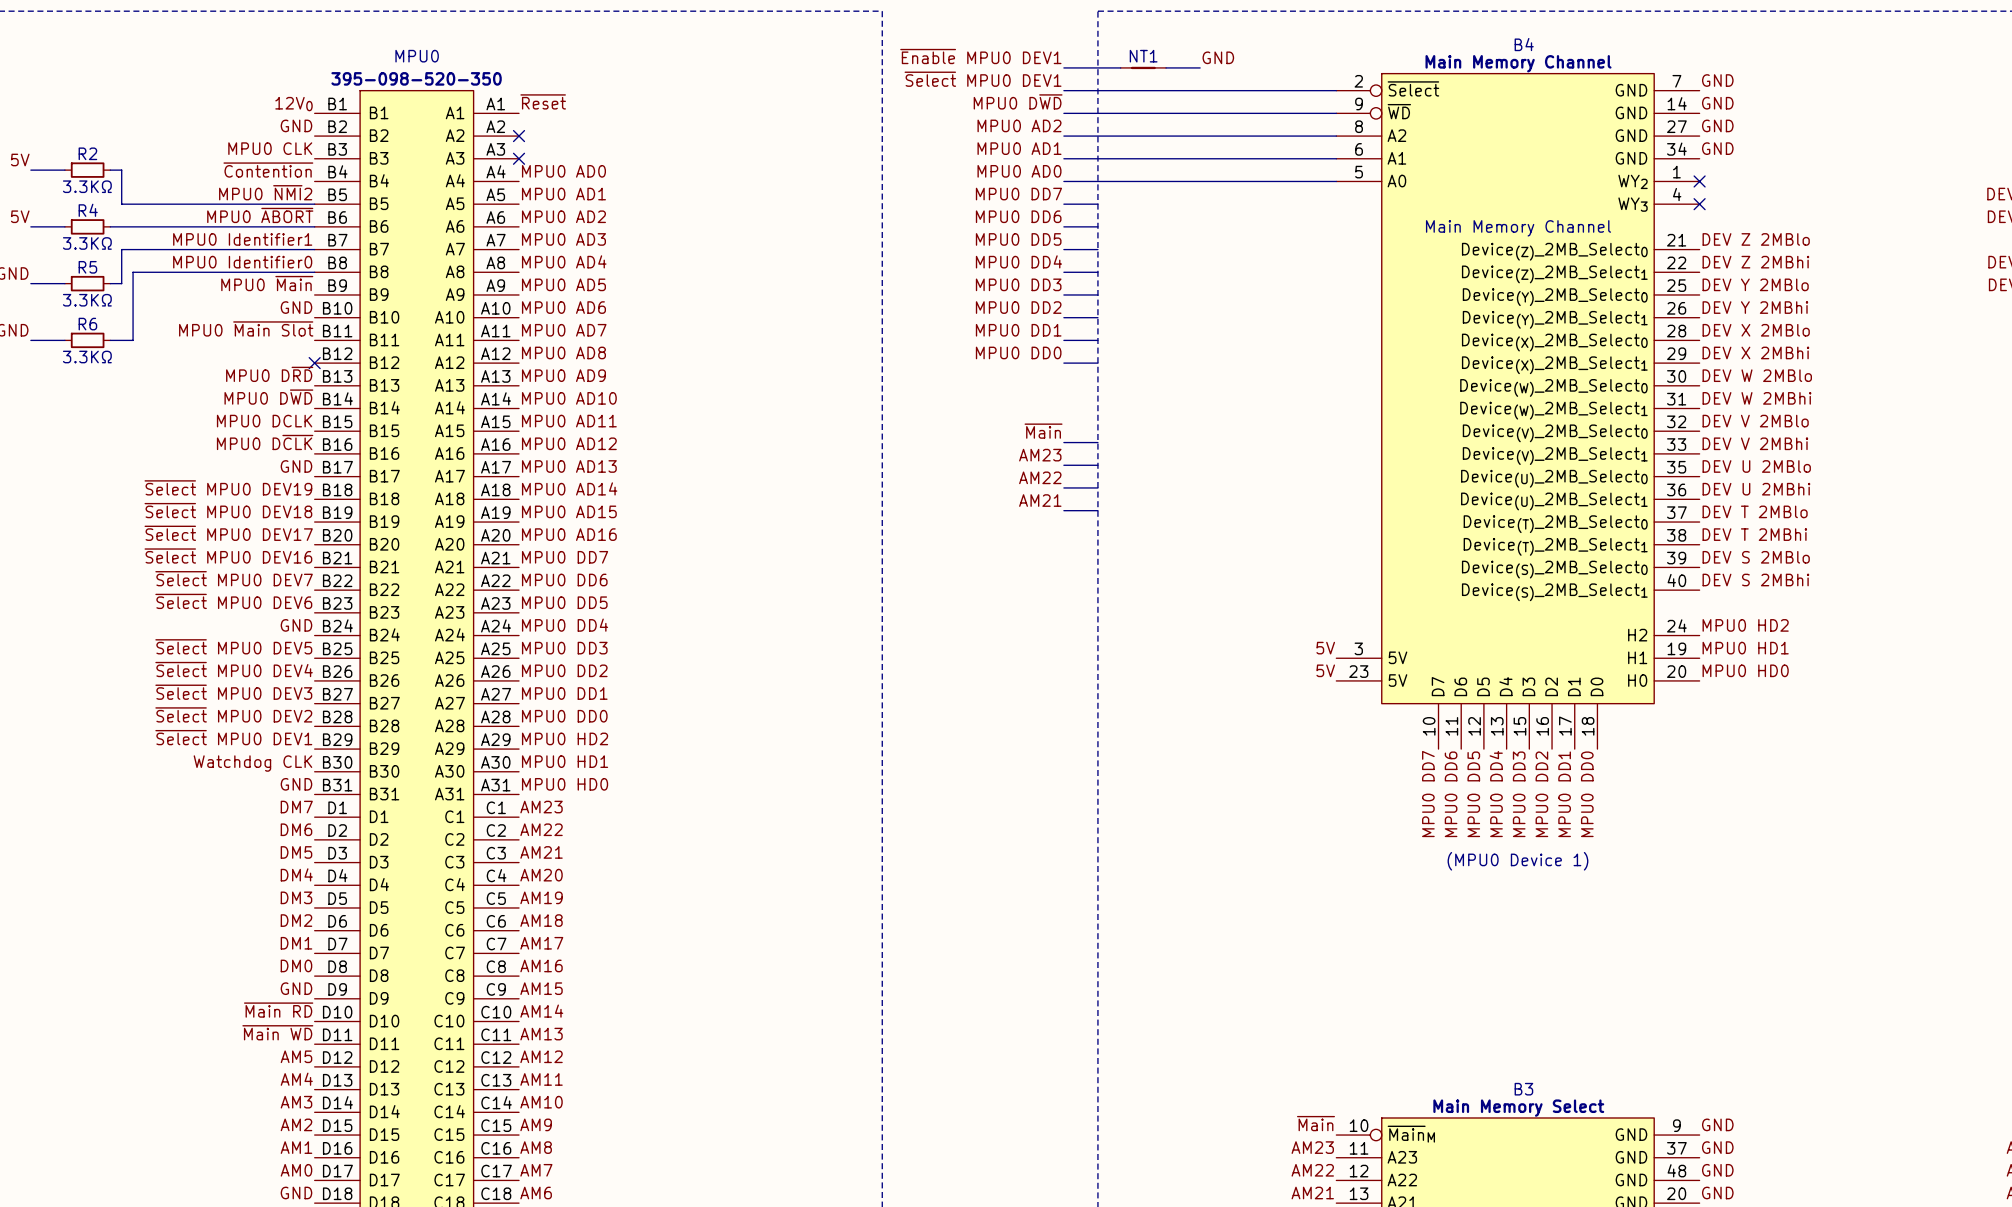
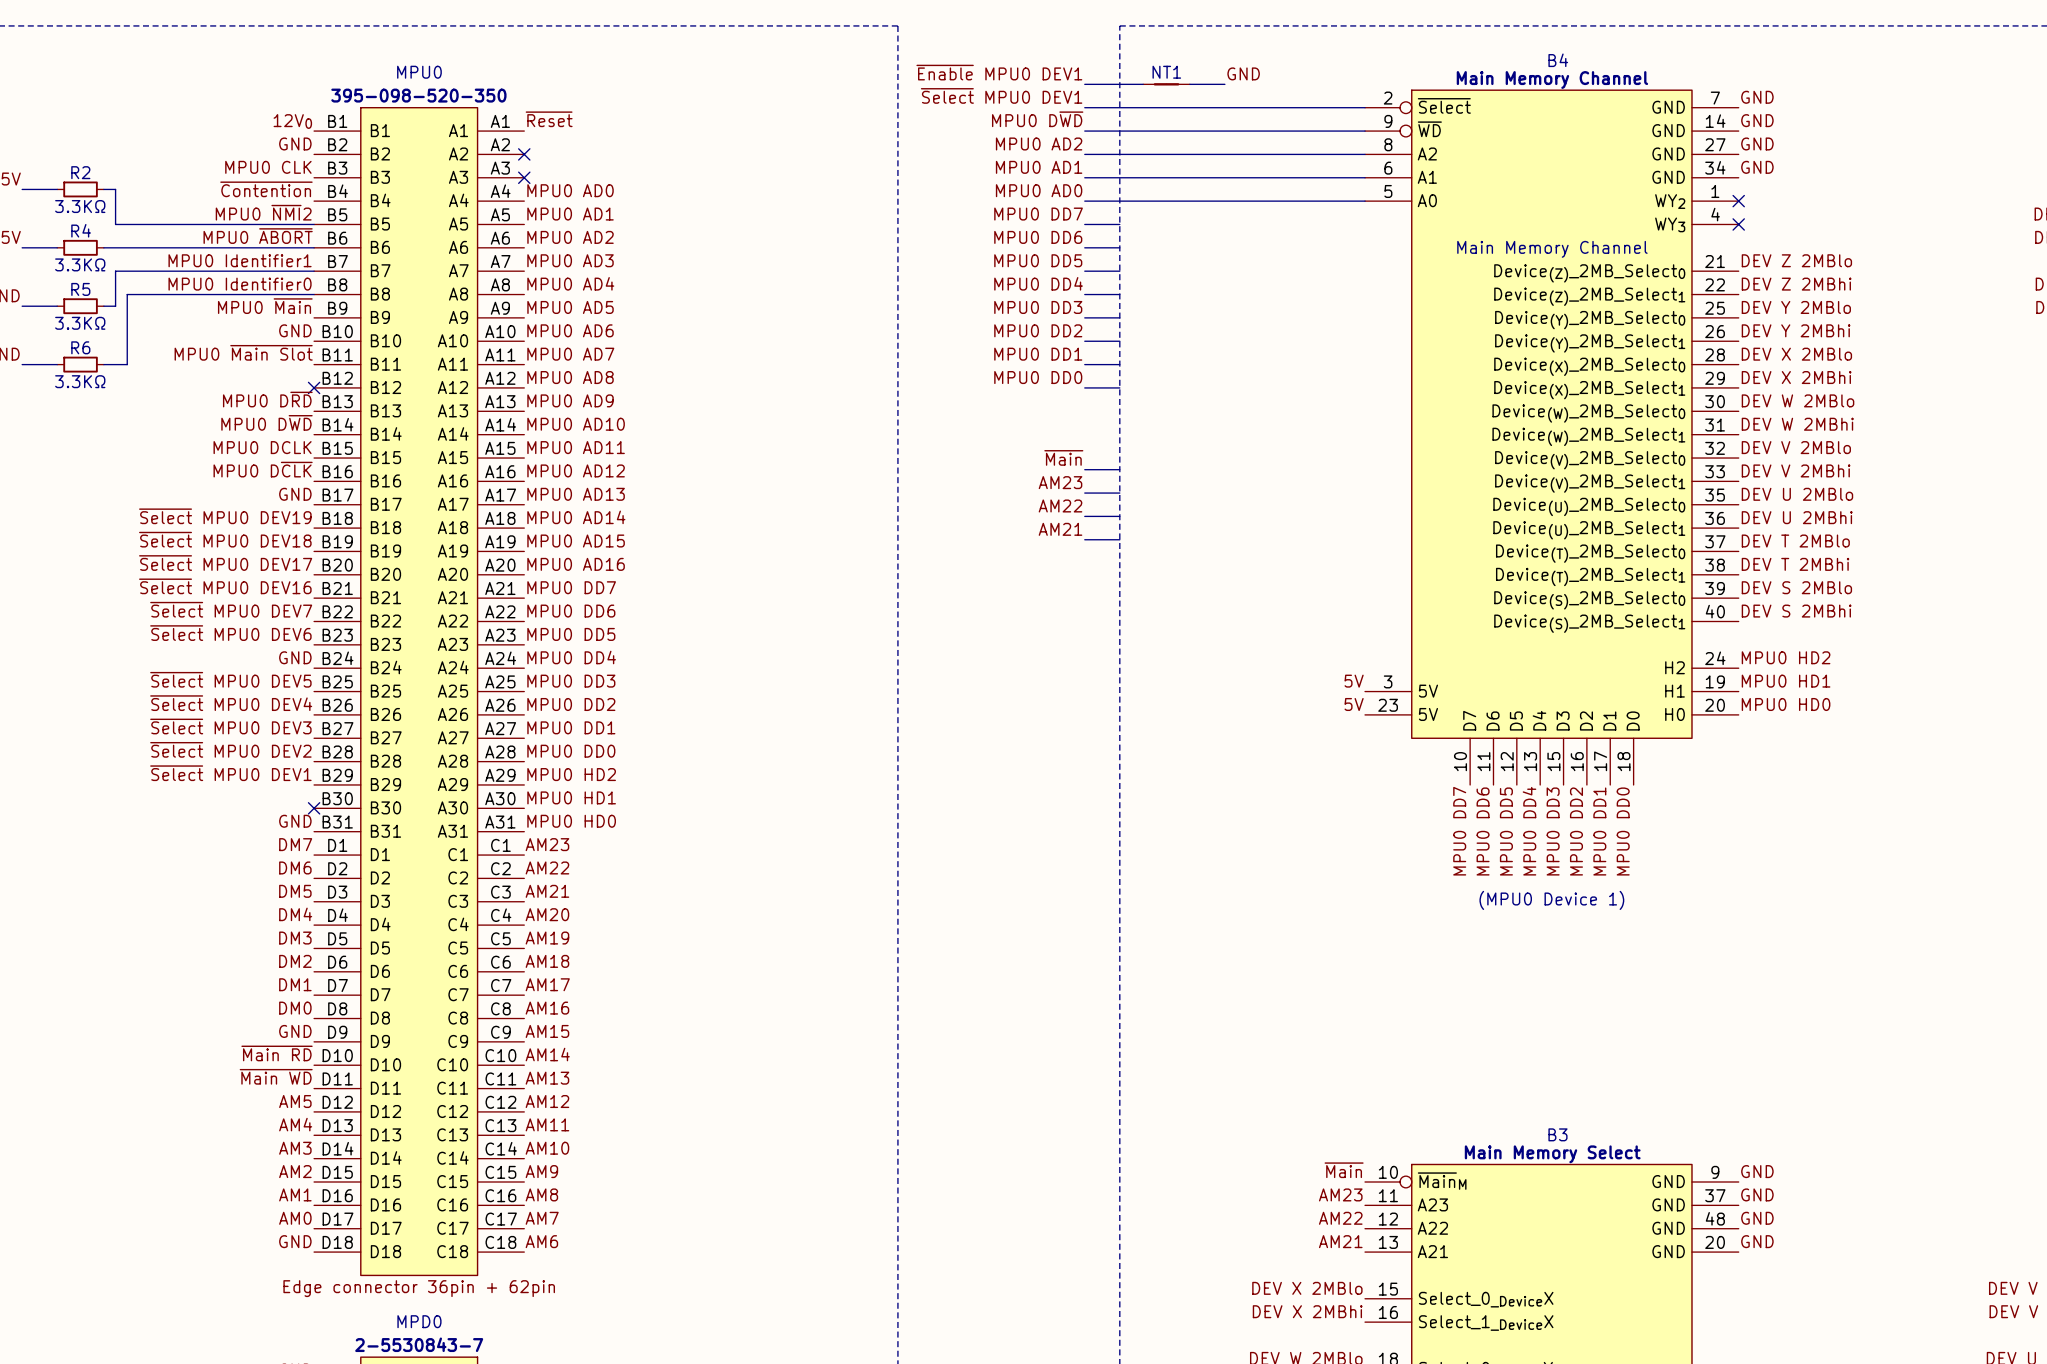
label: Watchdog CLK (252, 763) -> none
no-connect mark: none -> (314, 808)

